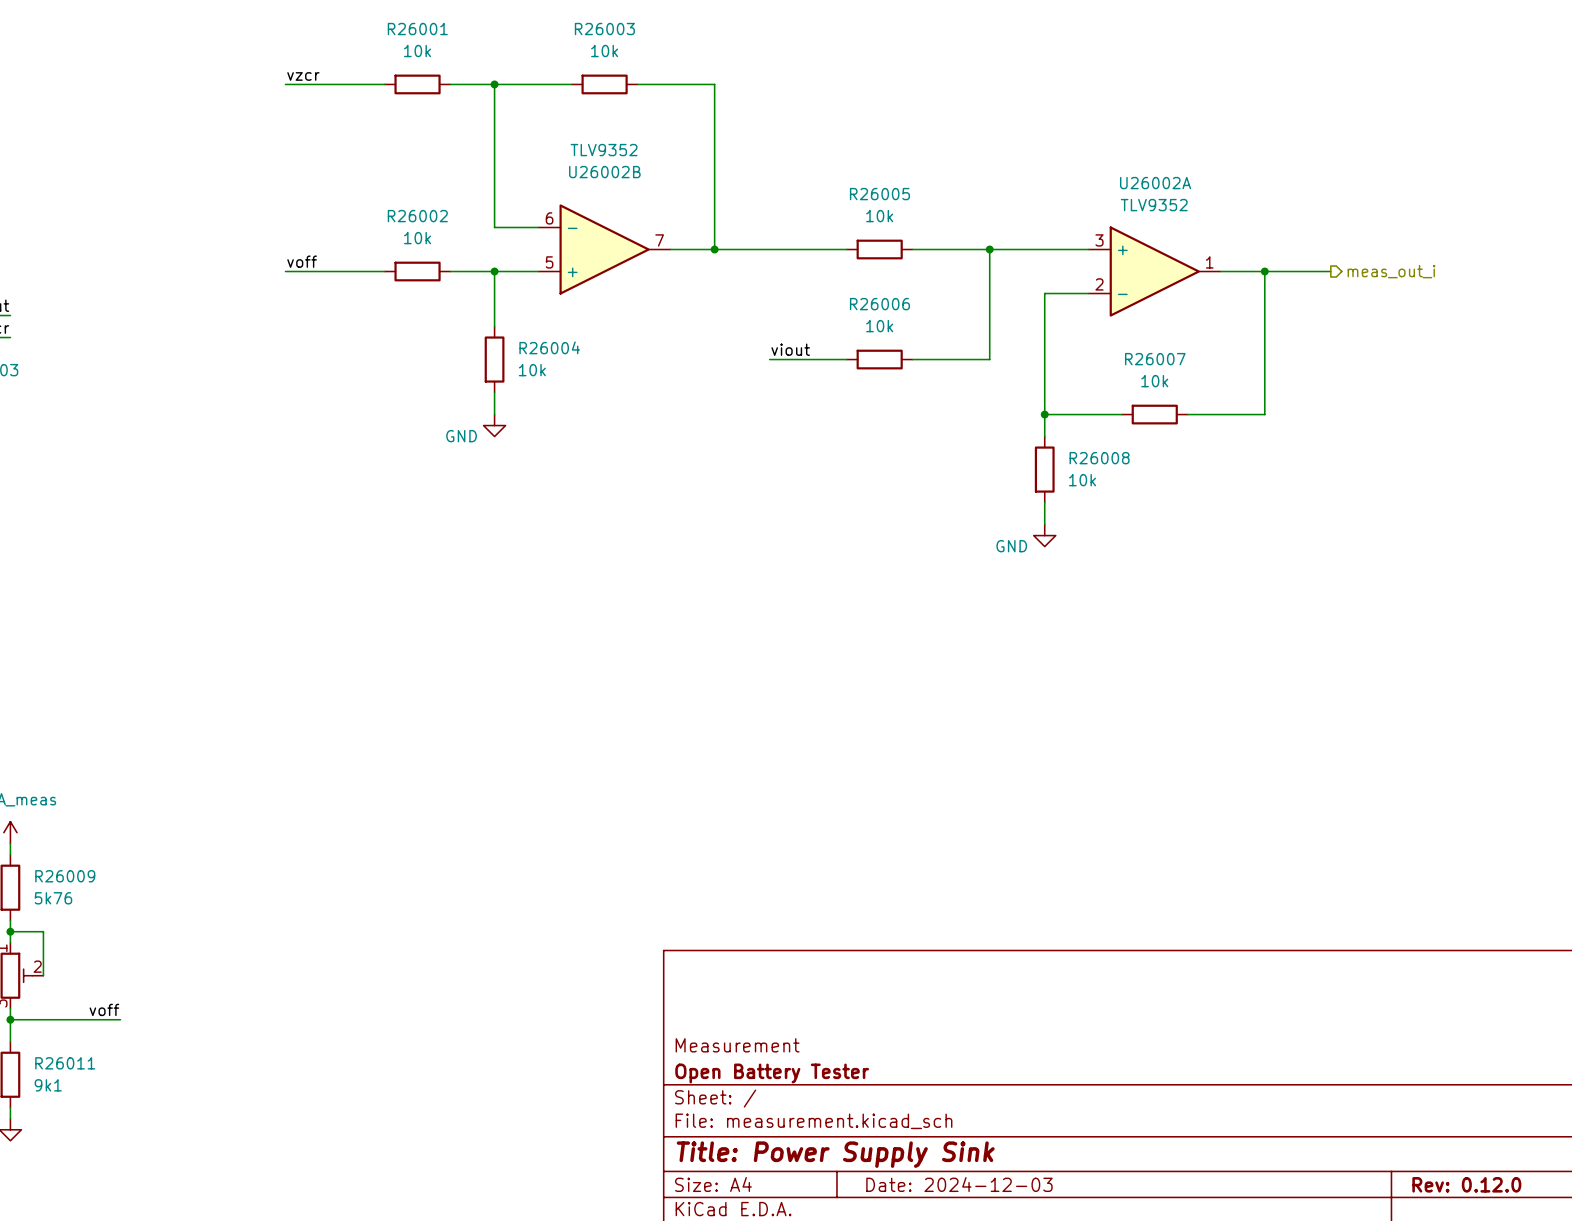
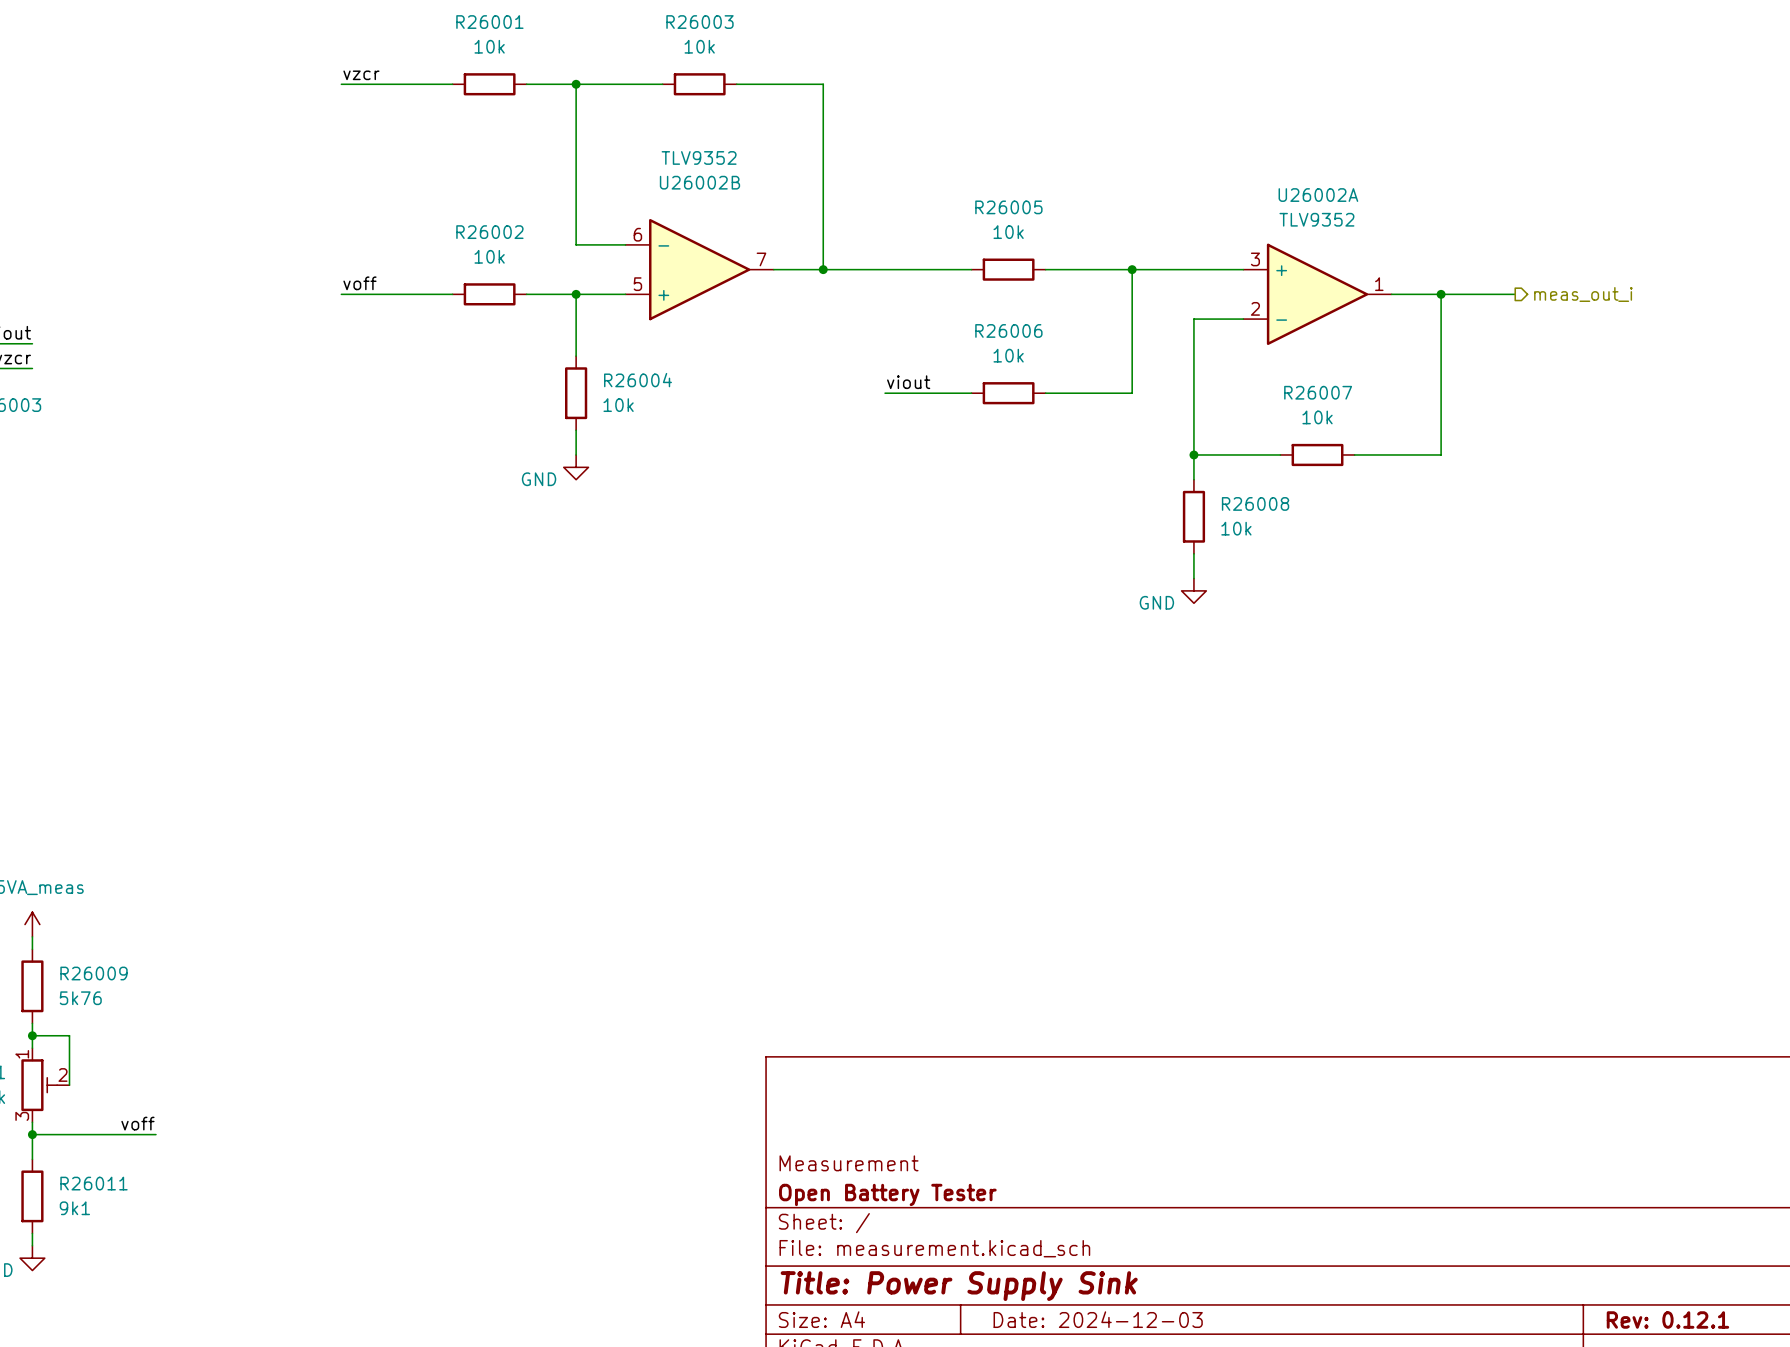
title block: Rev: 0.12.0 (1466, 1184) -> Rev: 0.12.1 (1667, 1320)

